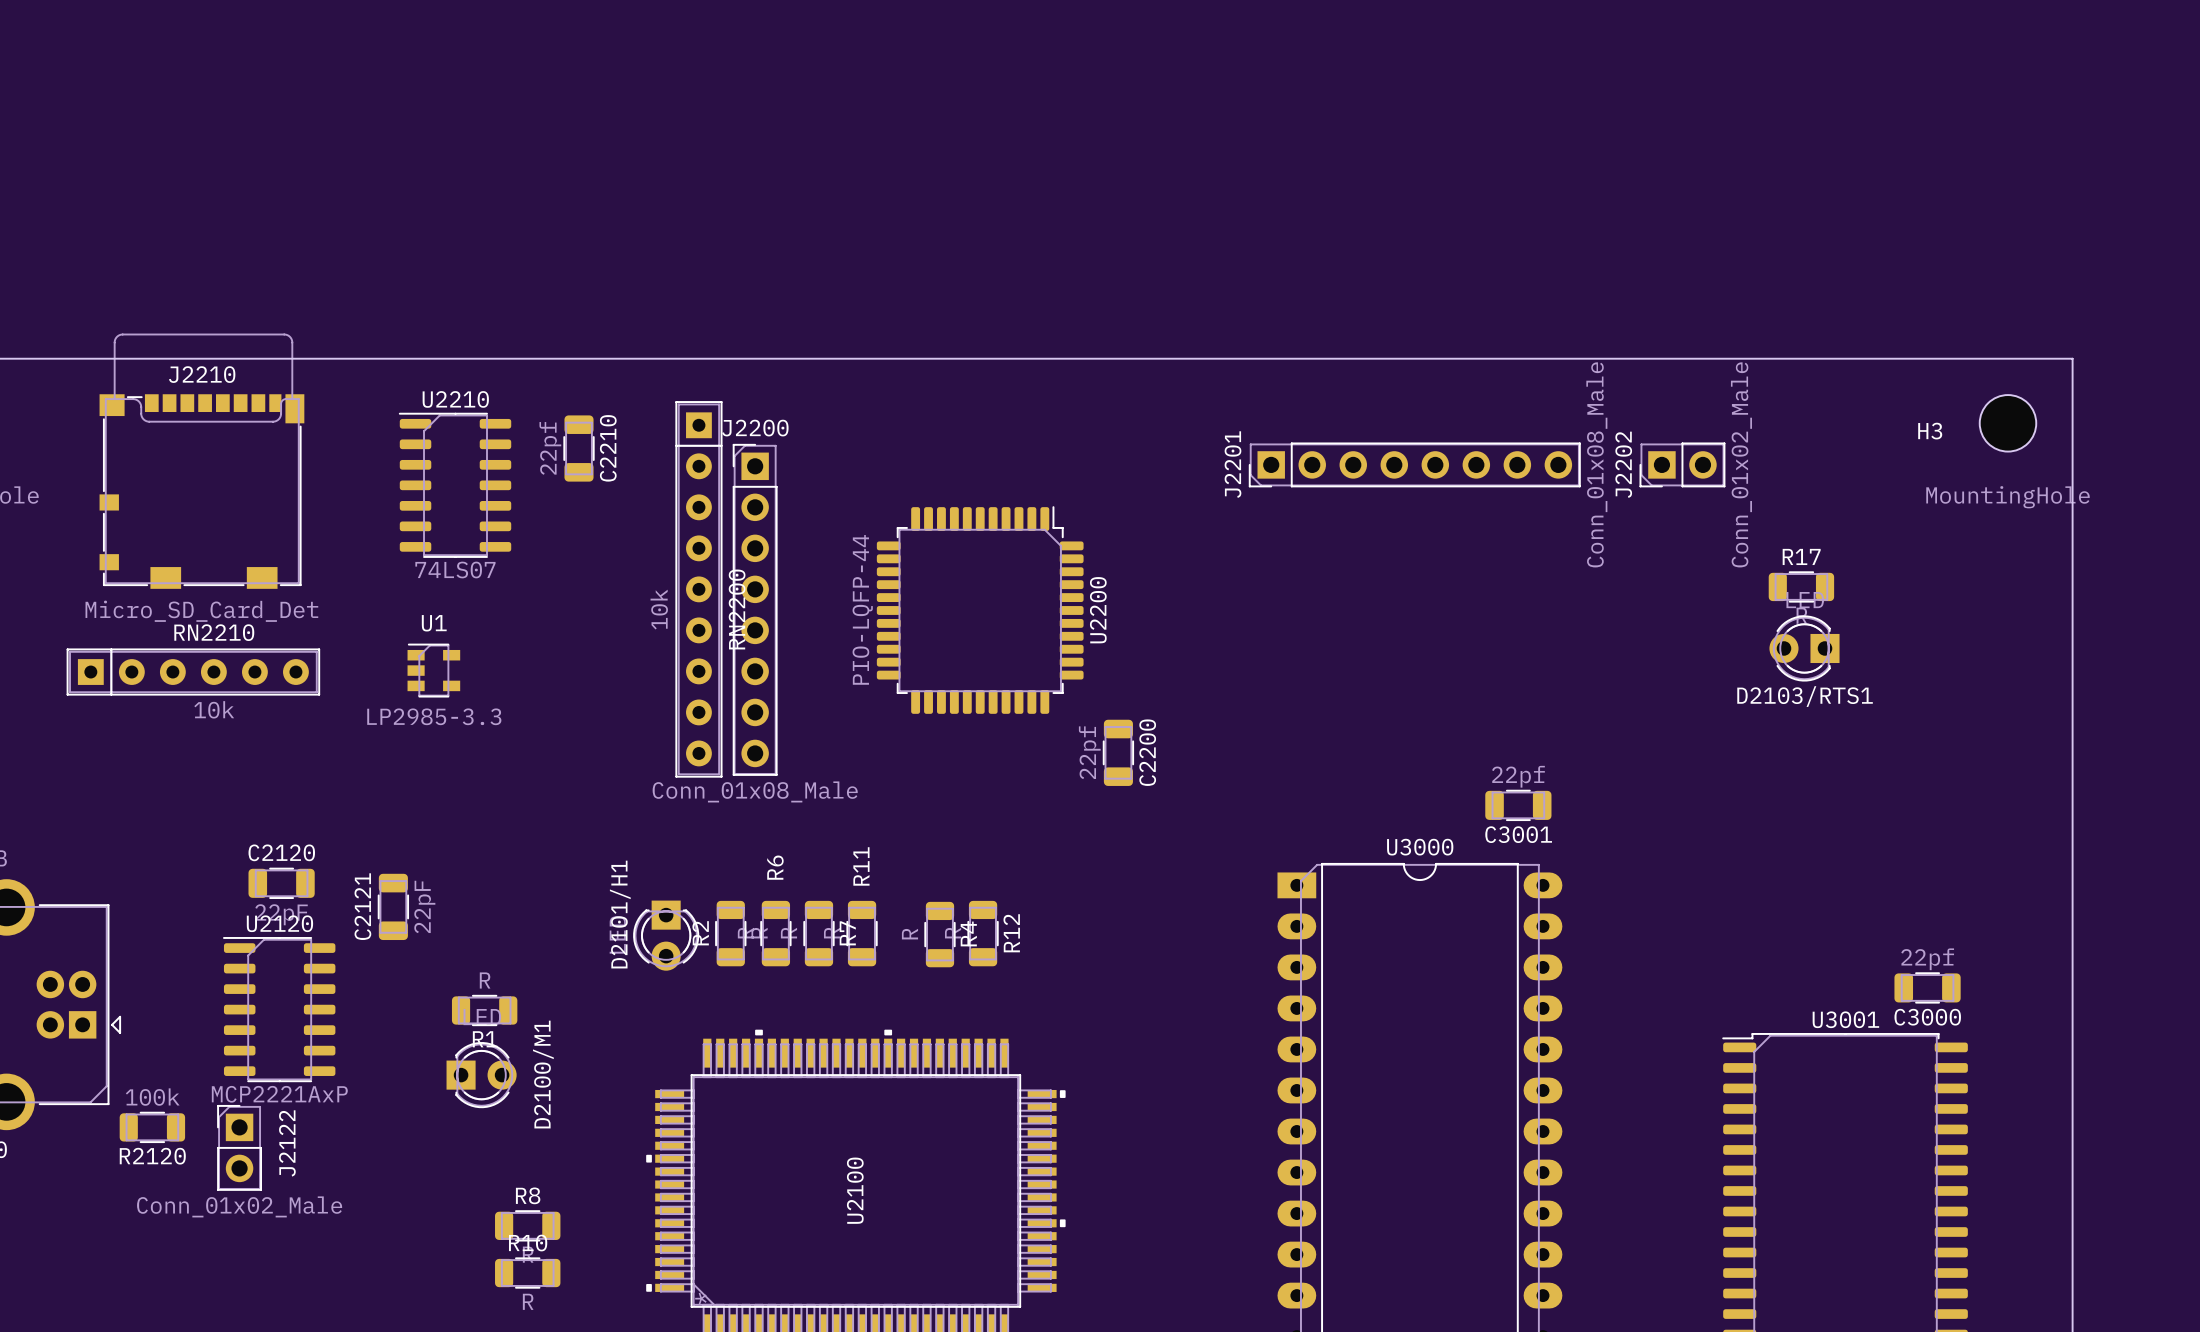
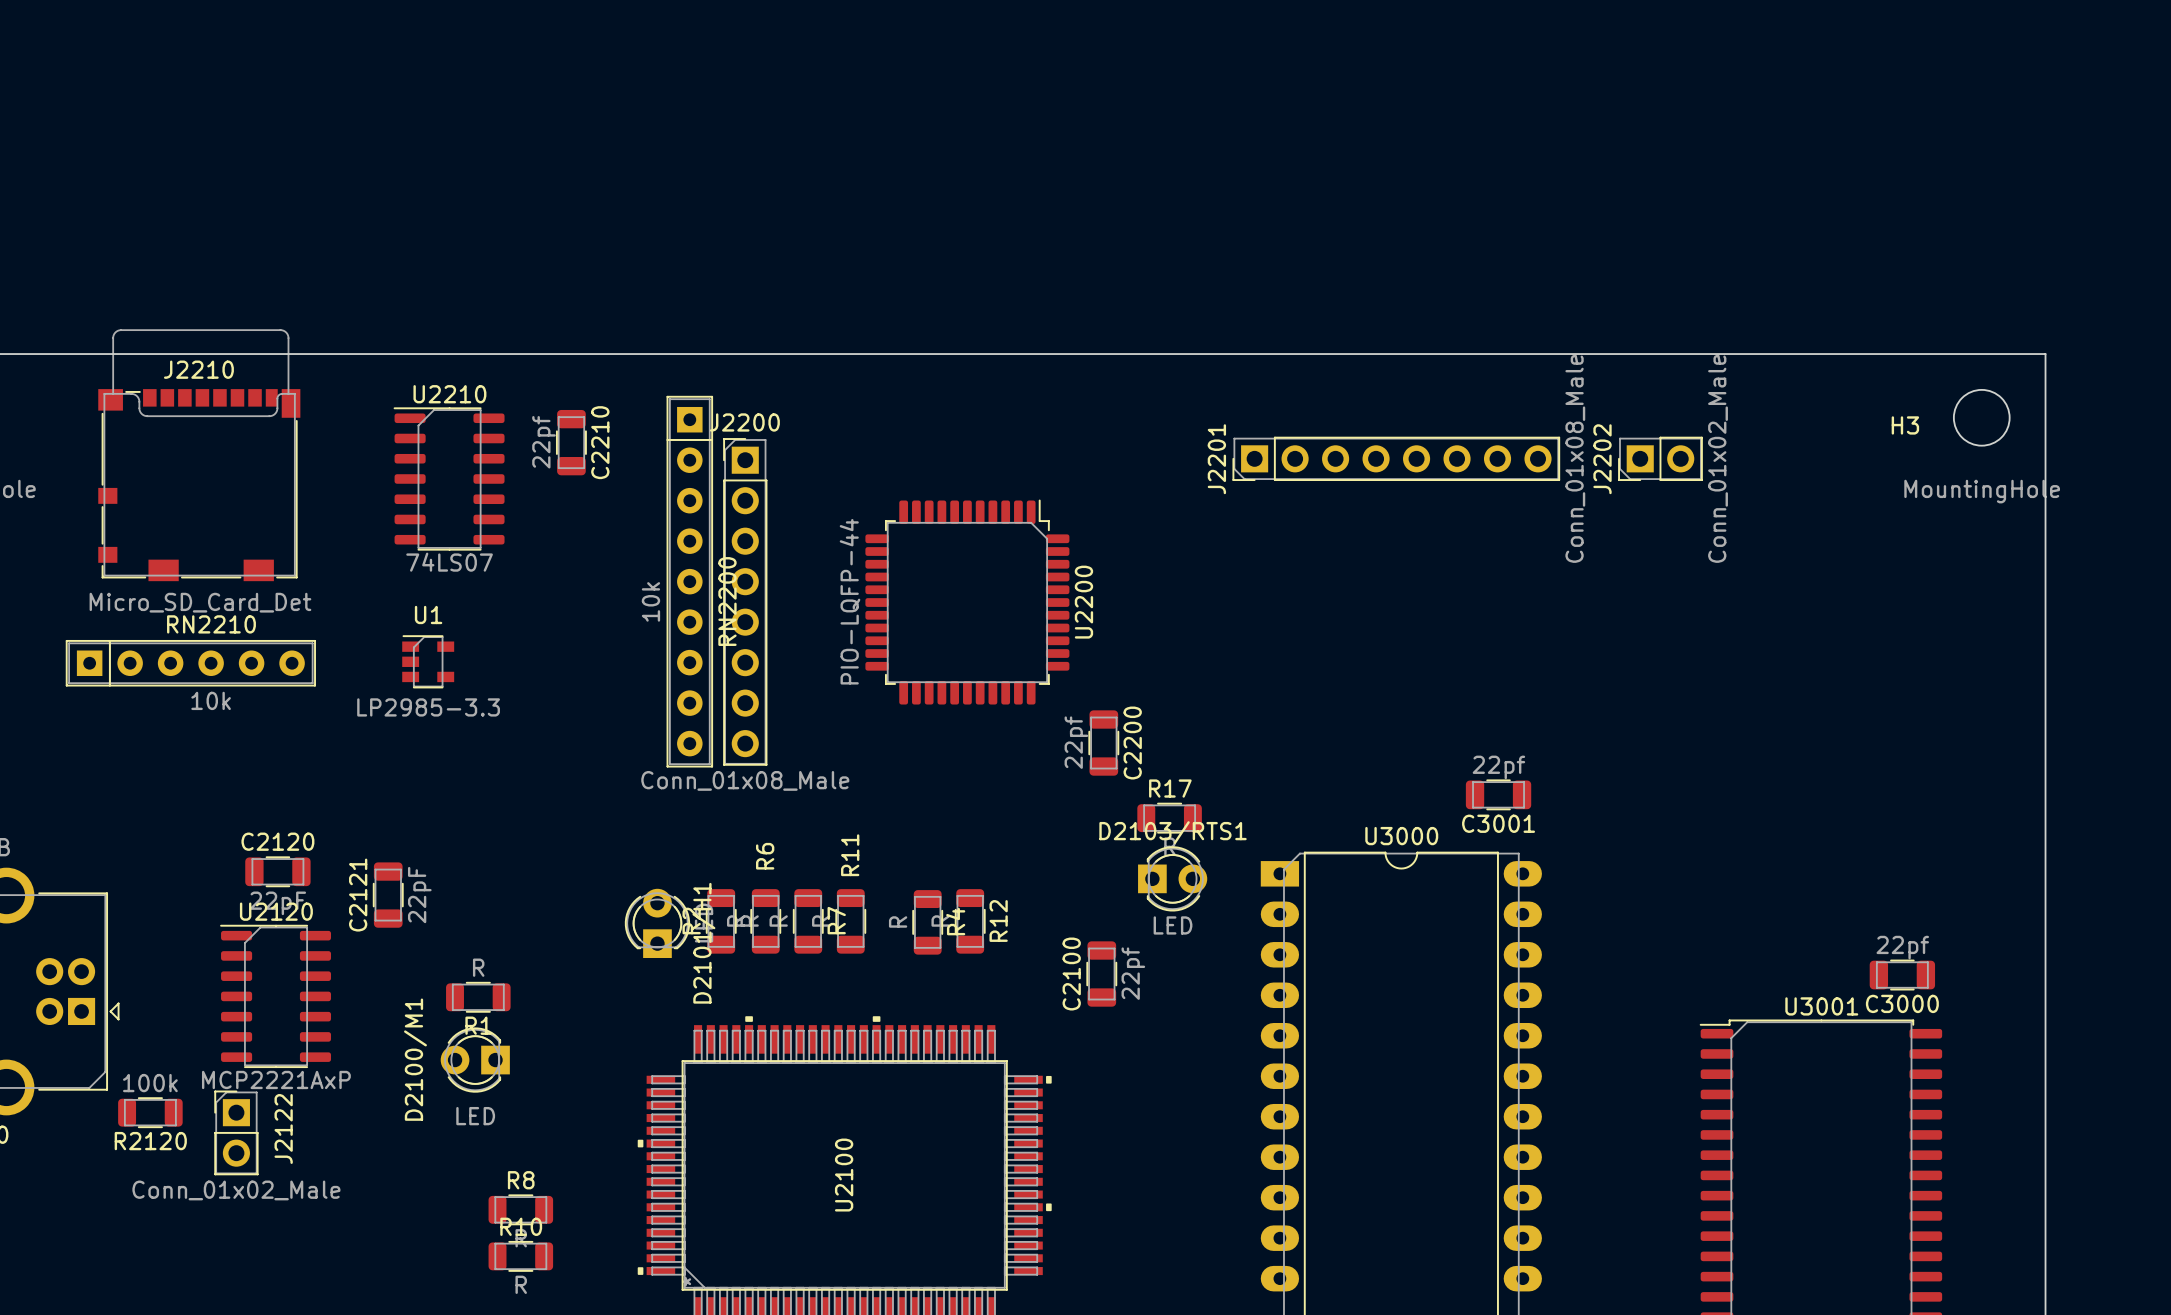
R17 position: (1801, 586) -> (1169, 818)
D2103/RTS1 rotation: 0° (1804, 648) -> 180° (1172, 878)
D2103/RTS1 position: (1804, 648) -> (1172, 878)
D2101/H1 rotation: 0° (666, 935) -> 180° (657, 923)
C2100: none -> 22pf (1101, 974)
D2100/M1 rotation: 0° (481, 1075) -> 180° (475, 1060)

